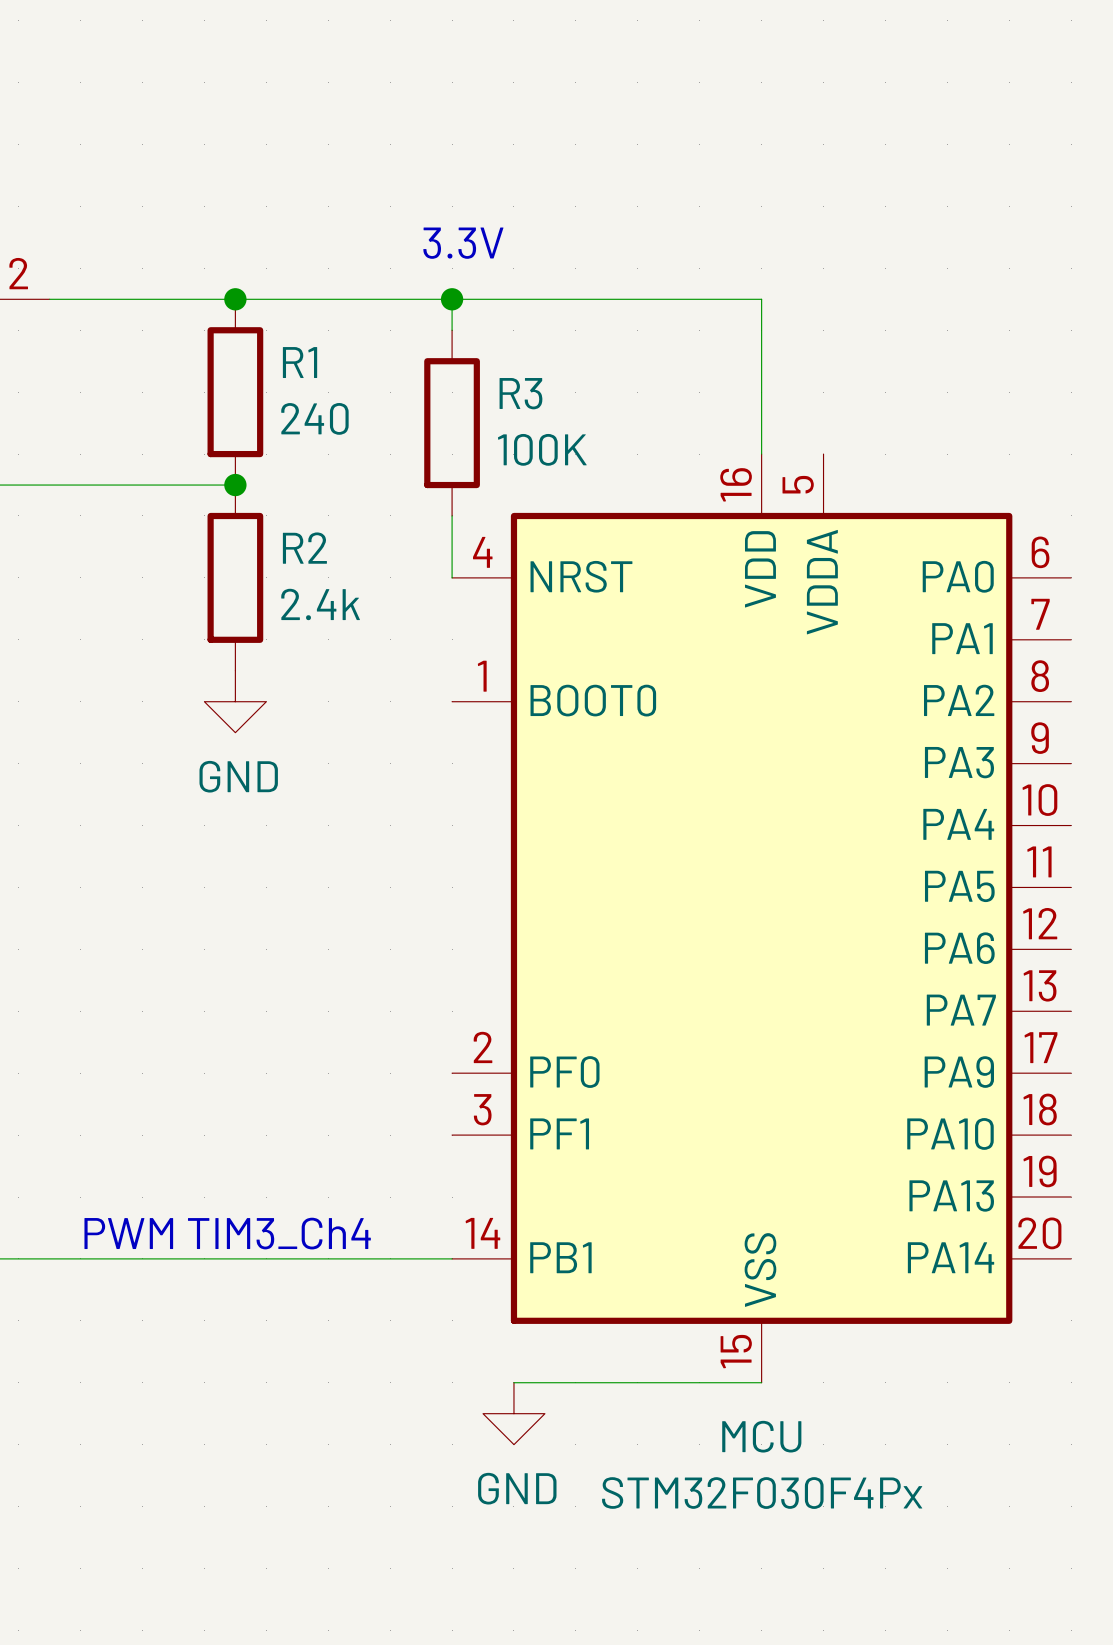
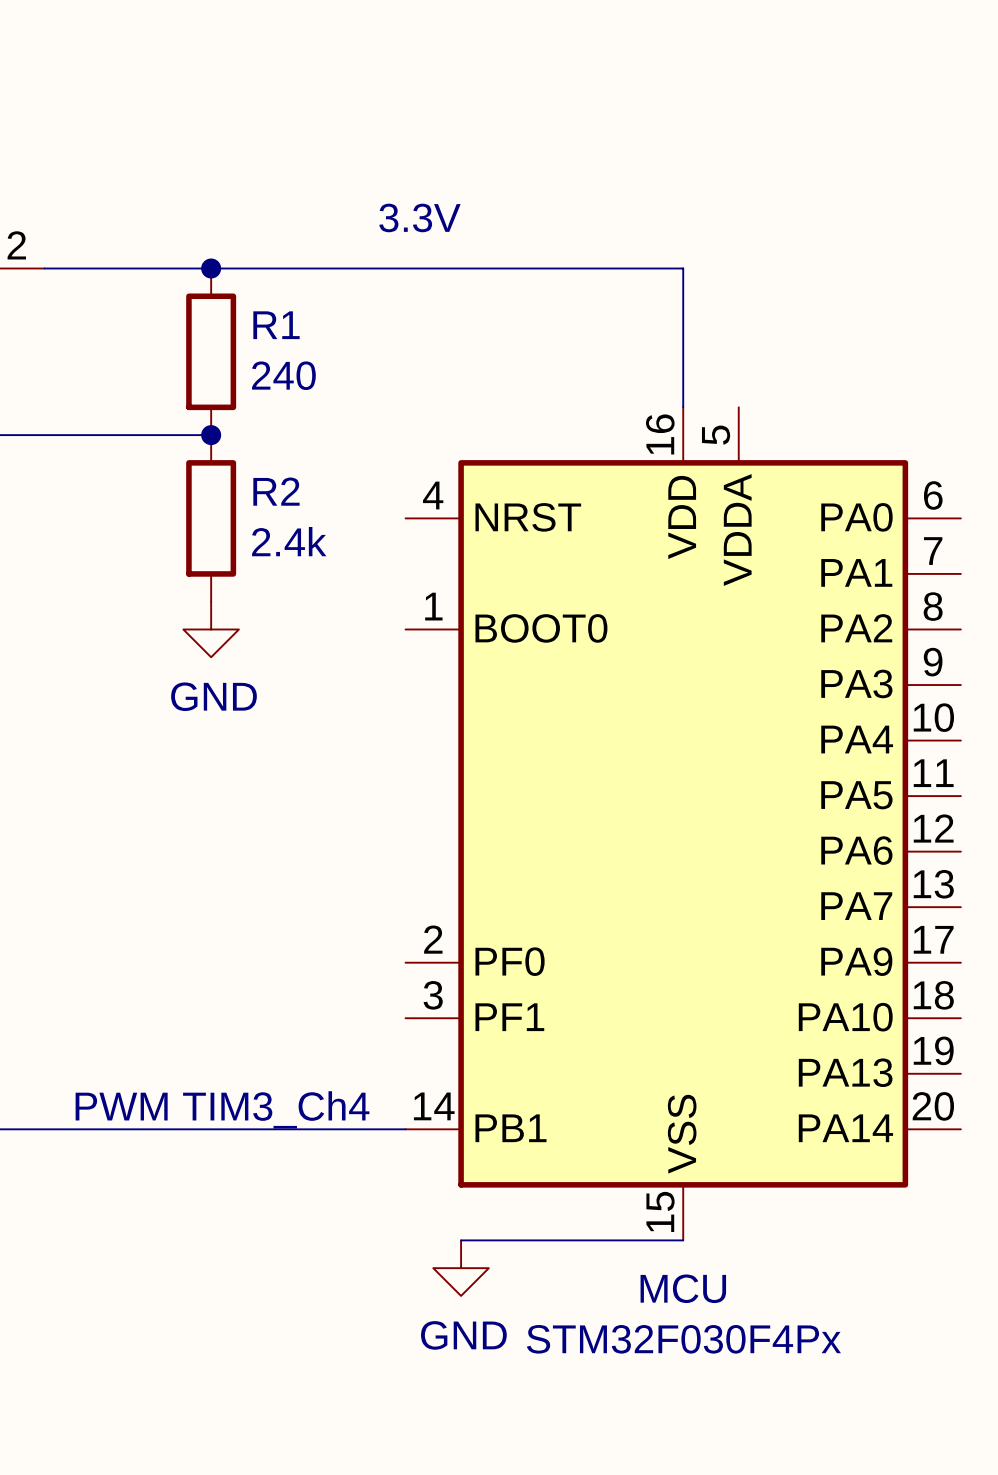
wire: (452, 299) (452, 330) -> none
junction: (452, 299) -> none
R3: 100K (452, 423) -> none
wire: (452, 515) (452, 577) -> none

